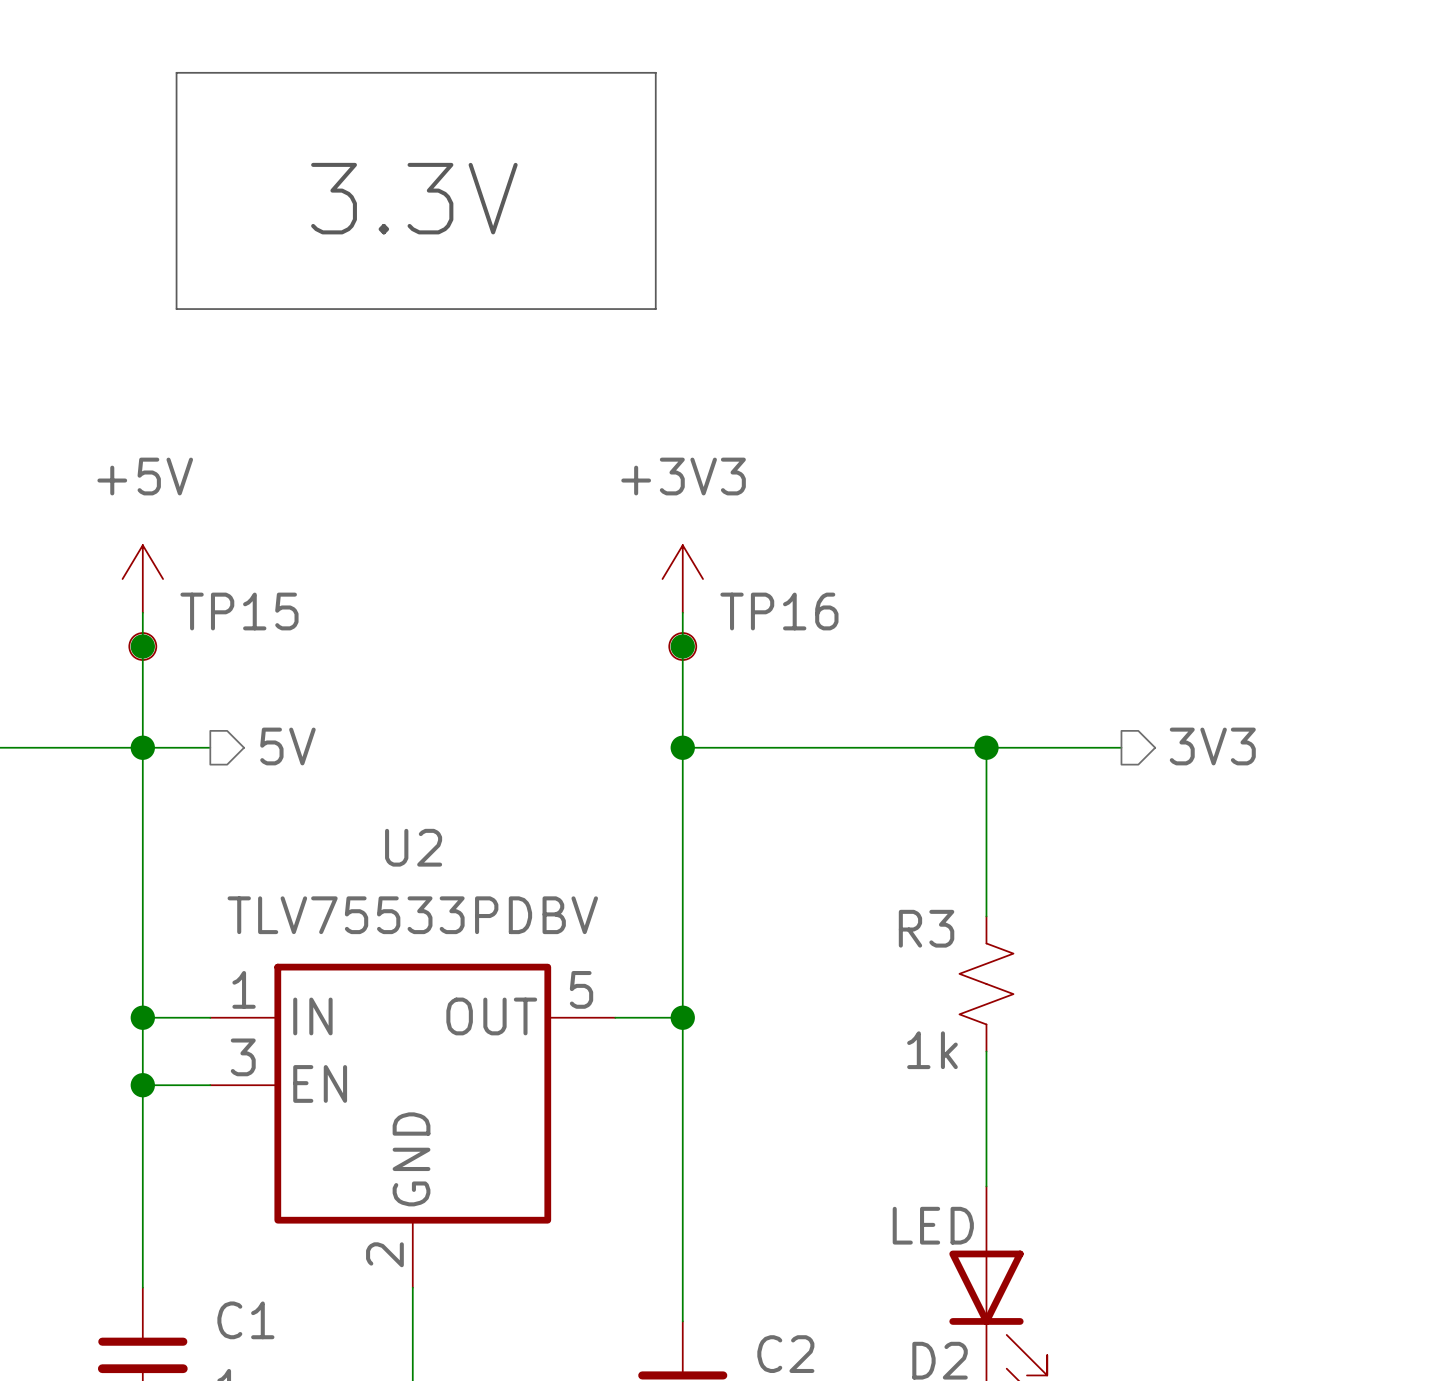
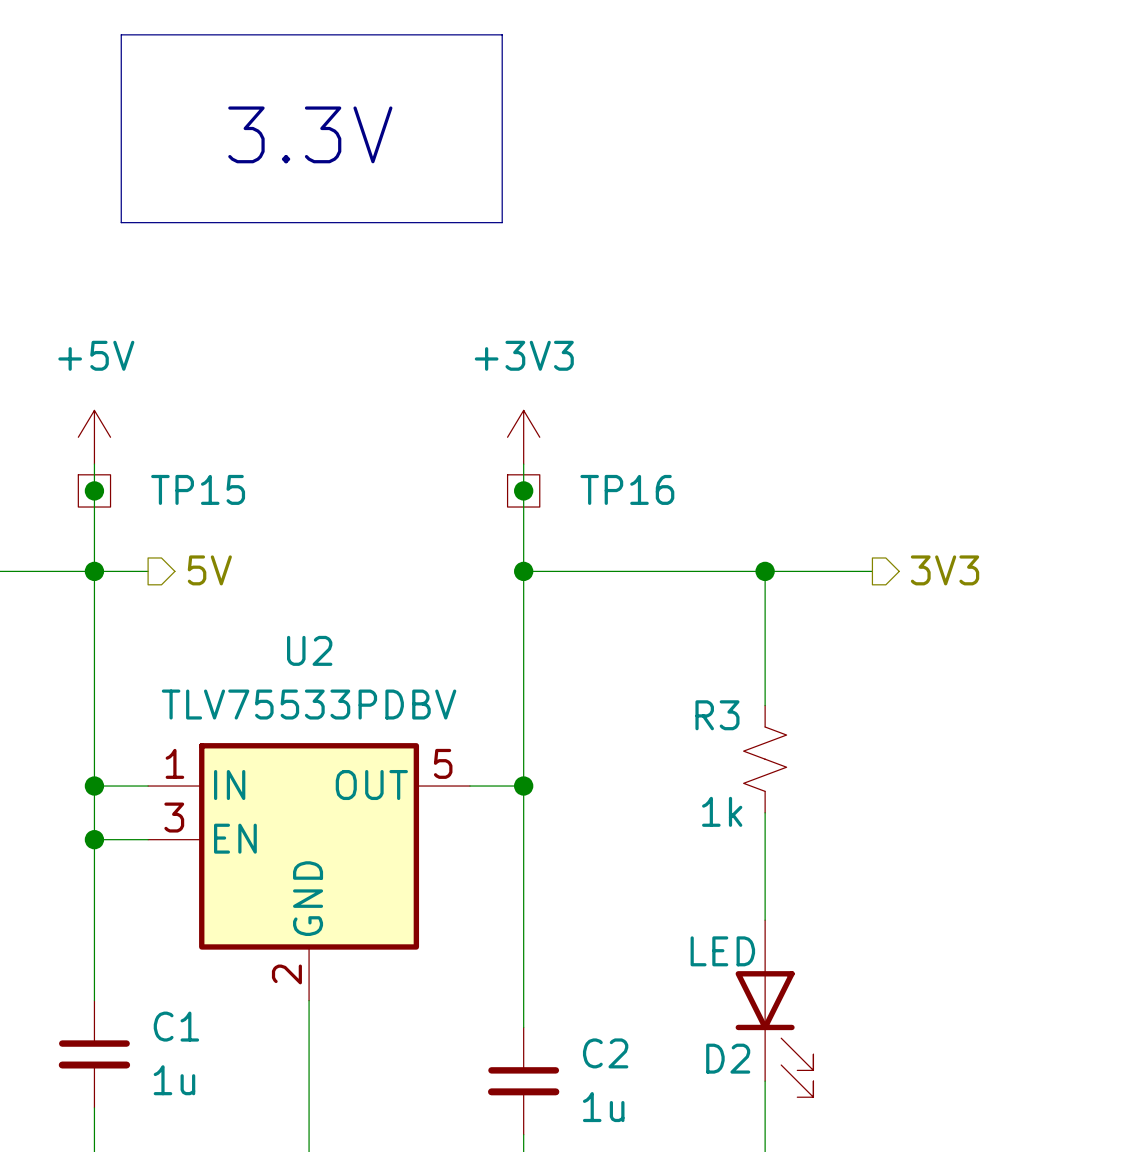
TP15 name position: TP15 (239, 611) -> TP15 (198, 489)
TP16 name position: TP16 (779, 611) -> TP16 (627, 489)
TP15 symbol: [129, 633, 157, 661] -> [78, 474, 111, 508]
TP16 symbol: [669, 633, 697, 661] -> [507, 474, 540, 508]

